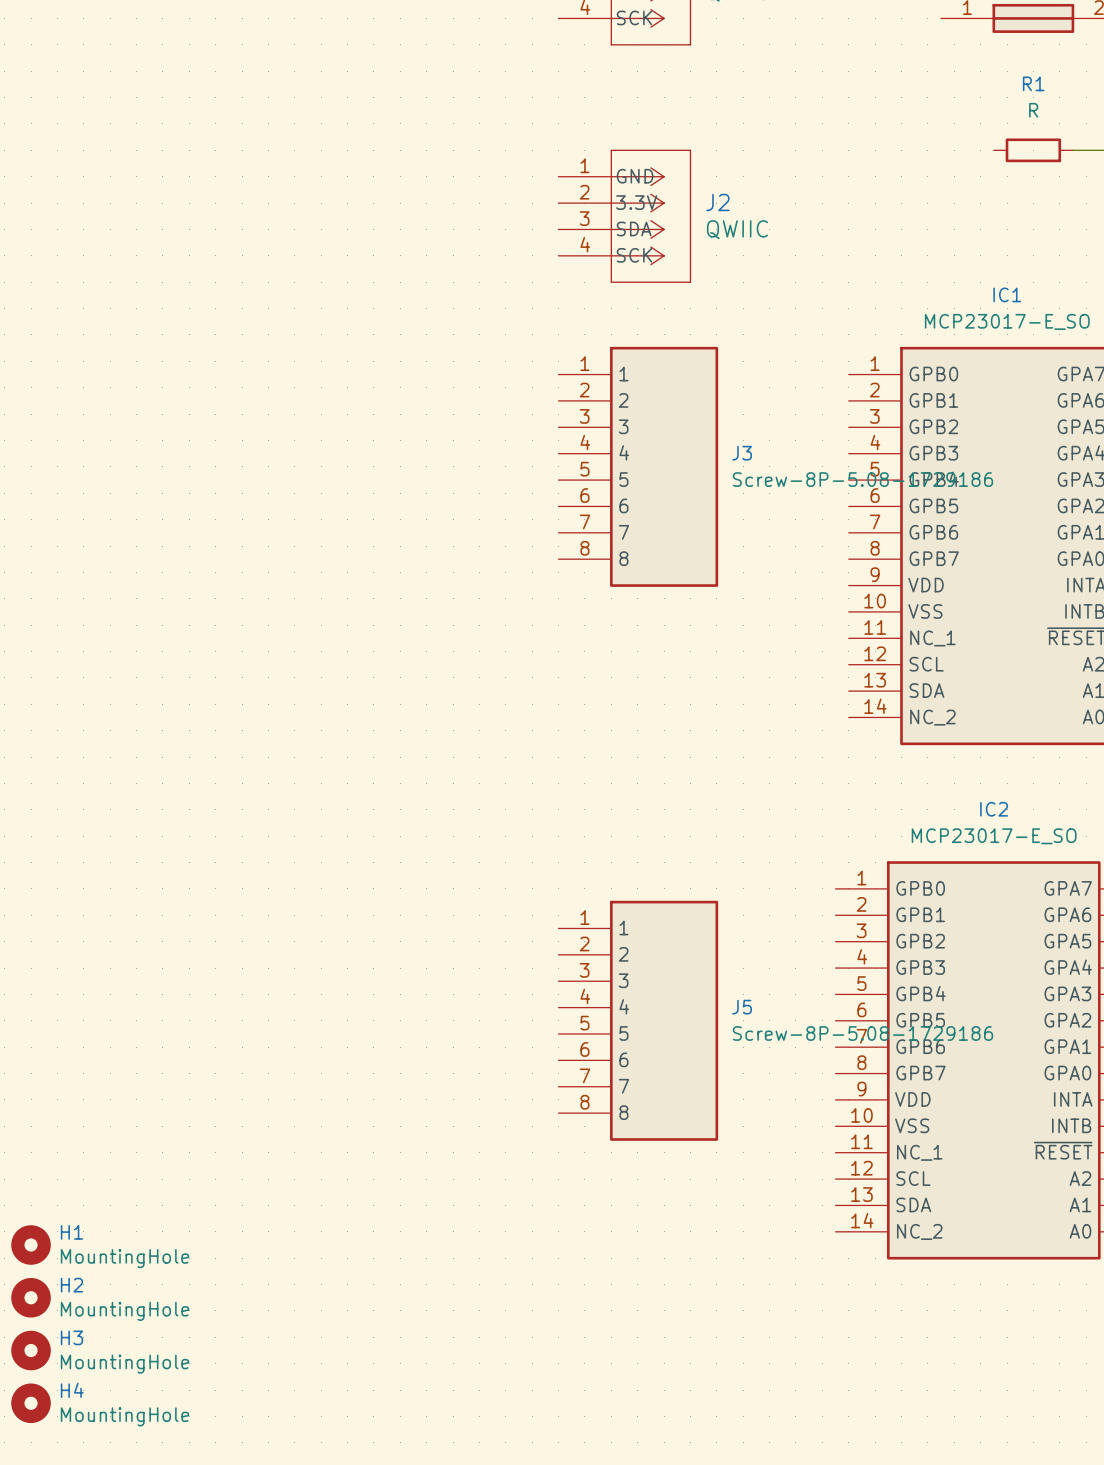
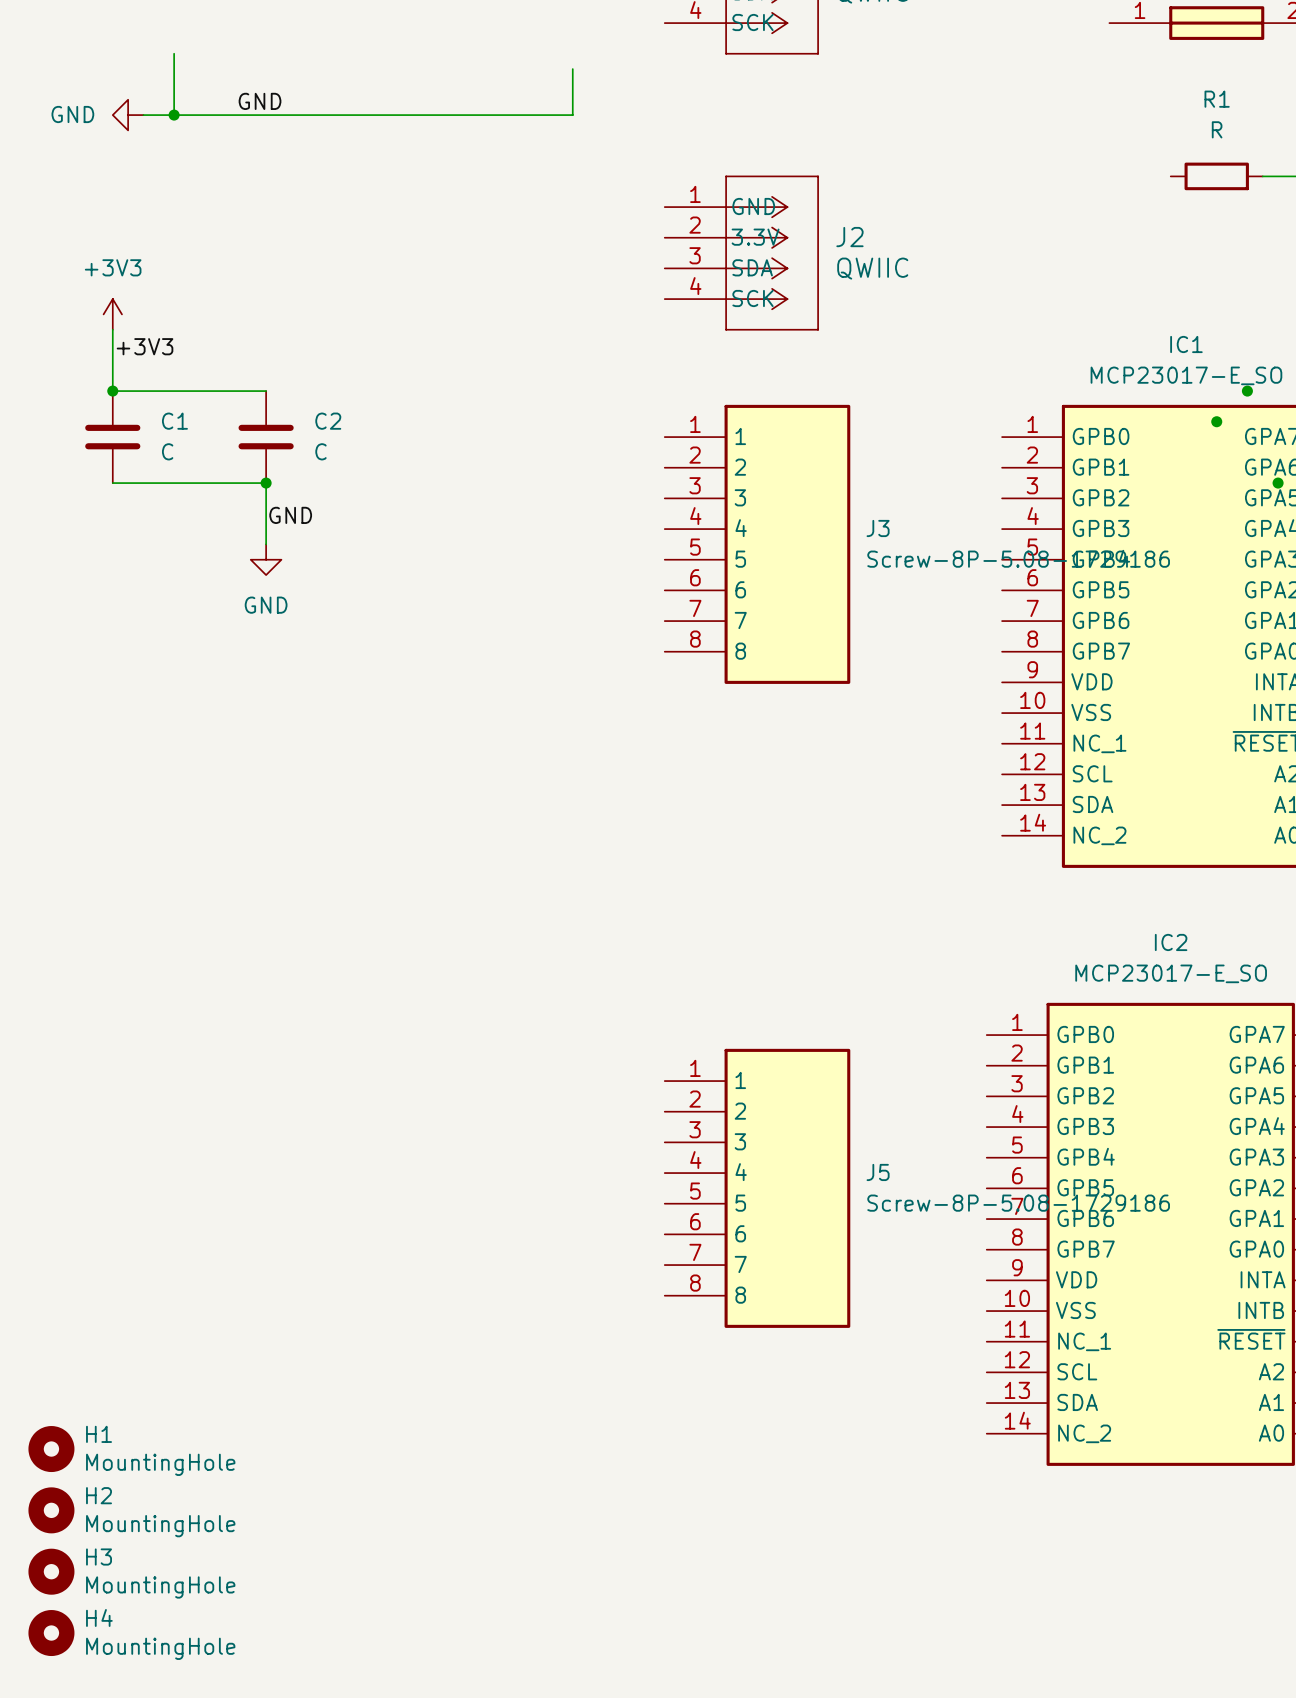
wire: none -> (174, 53) (174, 115)
wire: none -> (572, 69) (572, 115) (143, 115)
label: none -> GND (260, 101)
power symbol: none -> GND (128, 115)
junction: none -> (174, 115)
power symbol: none -> +3V3 (112, 314)
wire: none -> (112, 329) (112, 391) (266, 391)
label: none -> +3V3 (145, 346)
junction: none -> (112, 391)
junction: none -> (1247, 391)
junction: none -> (1216, 421)
C1: none -> C (112, 437)
C2: none -> C (266, 437)
wire: none -> (112, 483) (266, 483) (266, 544)
junction: none -> (266, 483)
junction: none -> (1278, 483)
label: none -> GND (290, 515)
power symbol: none -> GND (266, 559)

